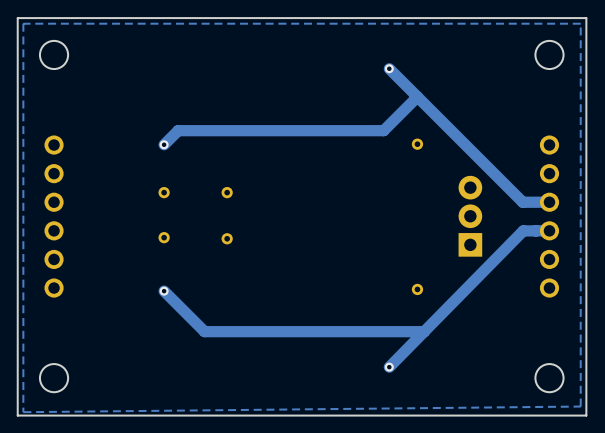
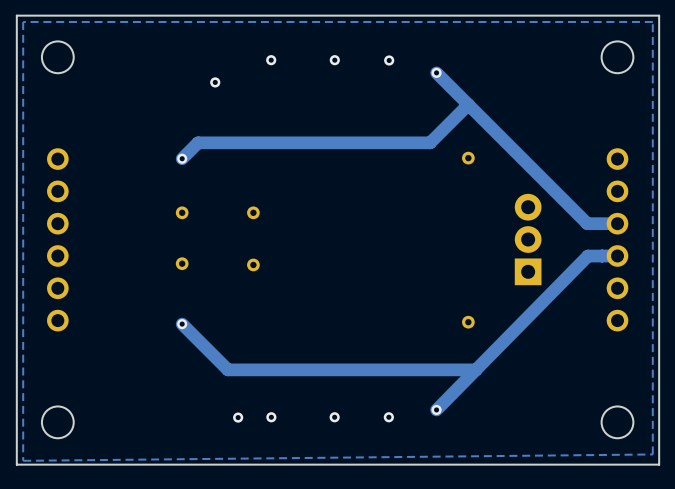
via: none -> (271, 60)
via: none -> (334, 60)
via: none -> (389, 60)
via: none -> (215, 82)
via: none -> (238, 417)
via: none -> (271, 417)
via: none -> (334, 417)
via: none -> (388, 417)

